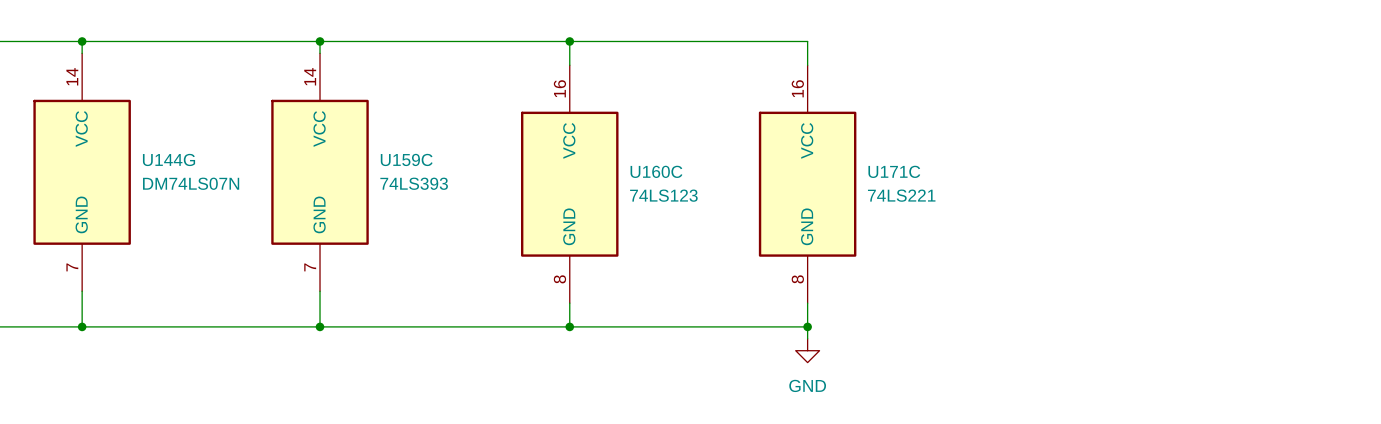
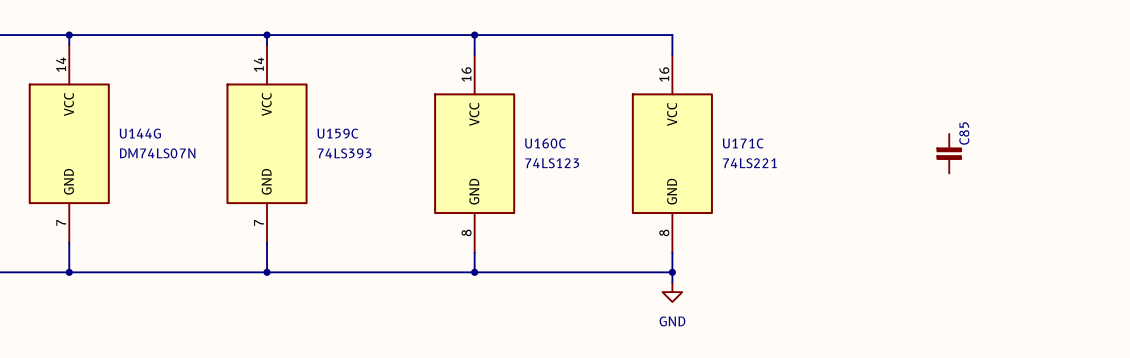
C85: none -> (949, 153)

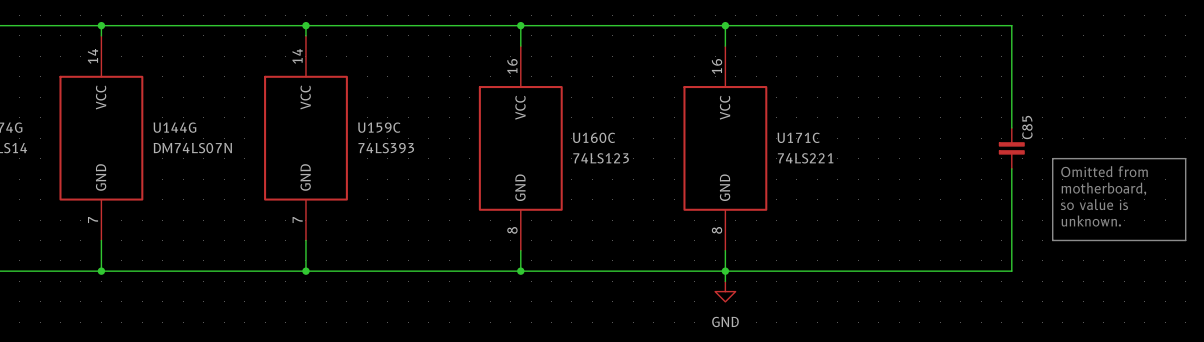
wire: none -> (725, 25) (1011, 25) (1011, 127)
junction: none -> (725, 25)
line: none -> (1052, 158) (1185, 158) (1185, 240) (1052, 240) (1052, 158)
wire: none -> (1011, 168) (1011, 271) (725, 271)
text: none -> Omitted from (1104, 171)
text: none -> motherboard, (1103, 189)
text: none -> so value is (1094, 204)
text: none -> unknown. (1091, 221)

